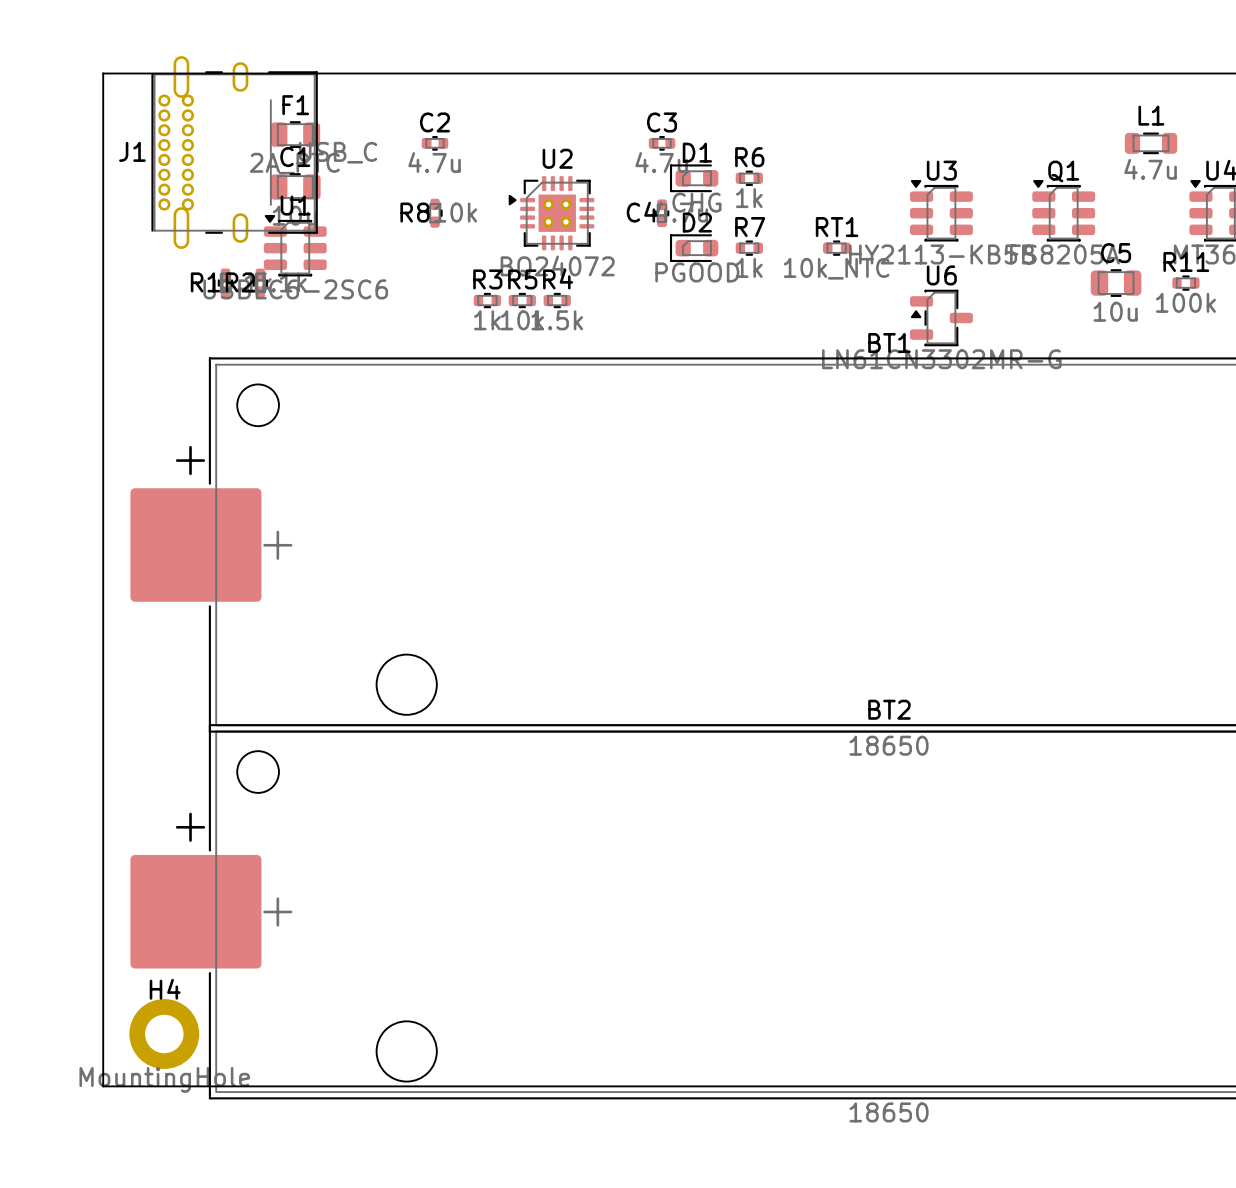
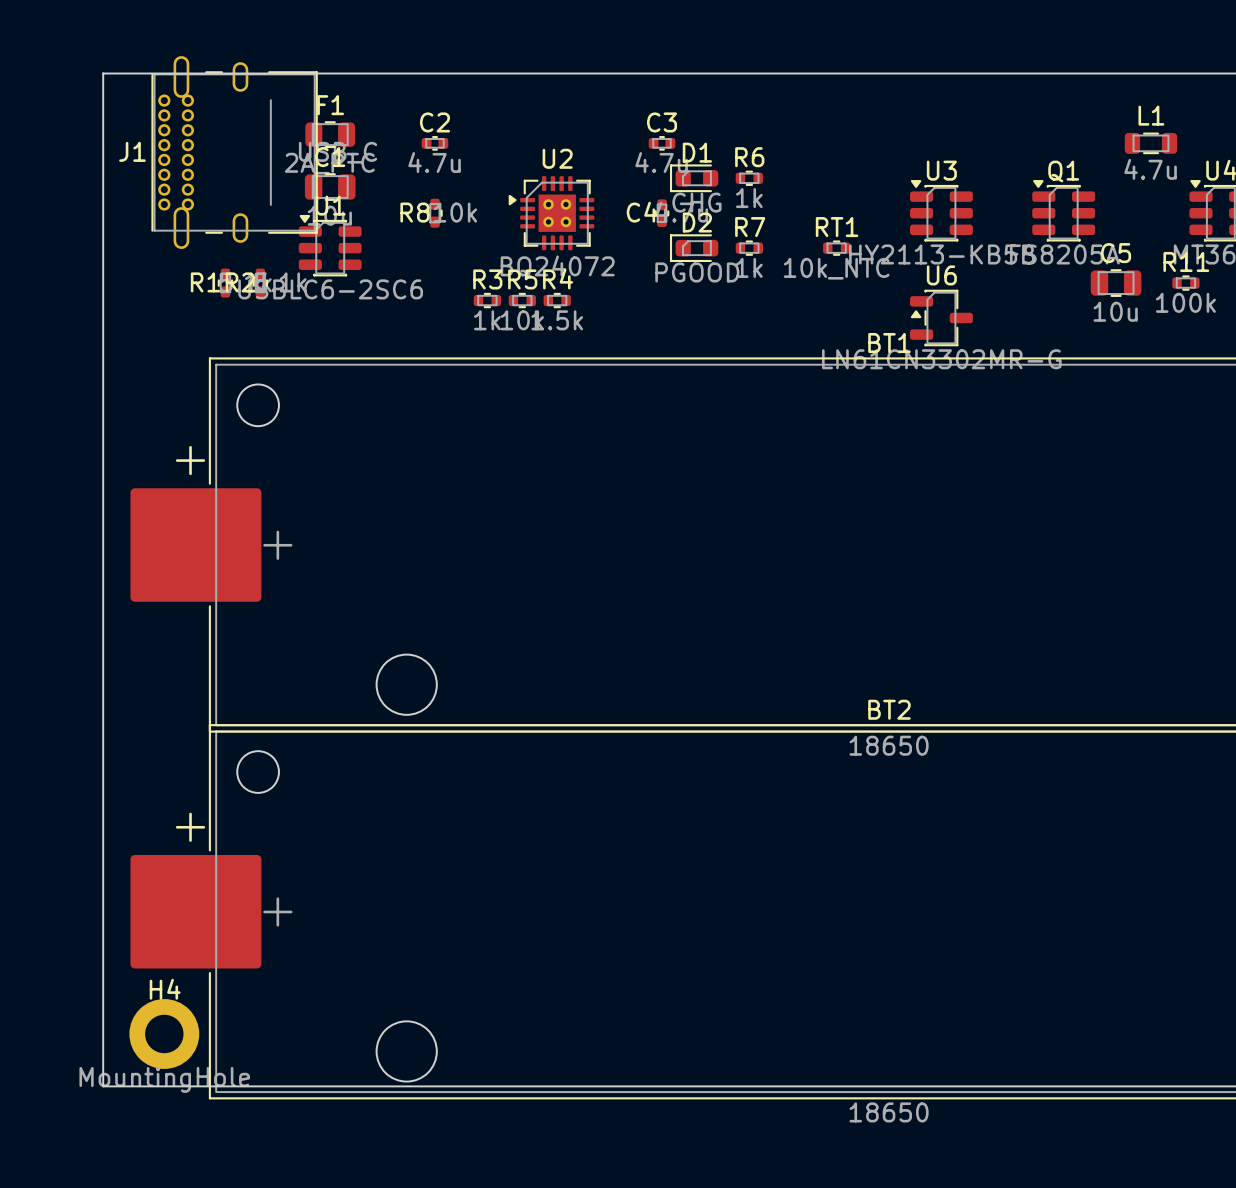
F1 position: (295, 134) -> (330, 134)
C1 position: (295, 187) -> (330, 187)
U1 position: (295, 245) -> (330, 245)

